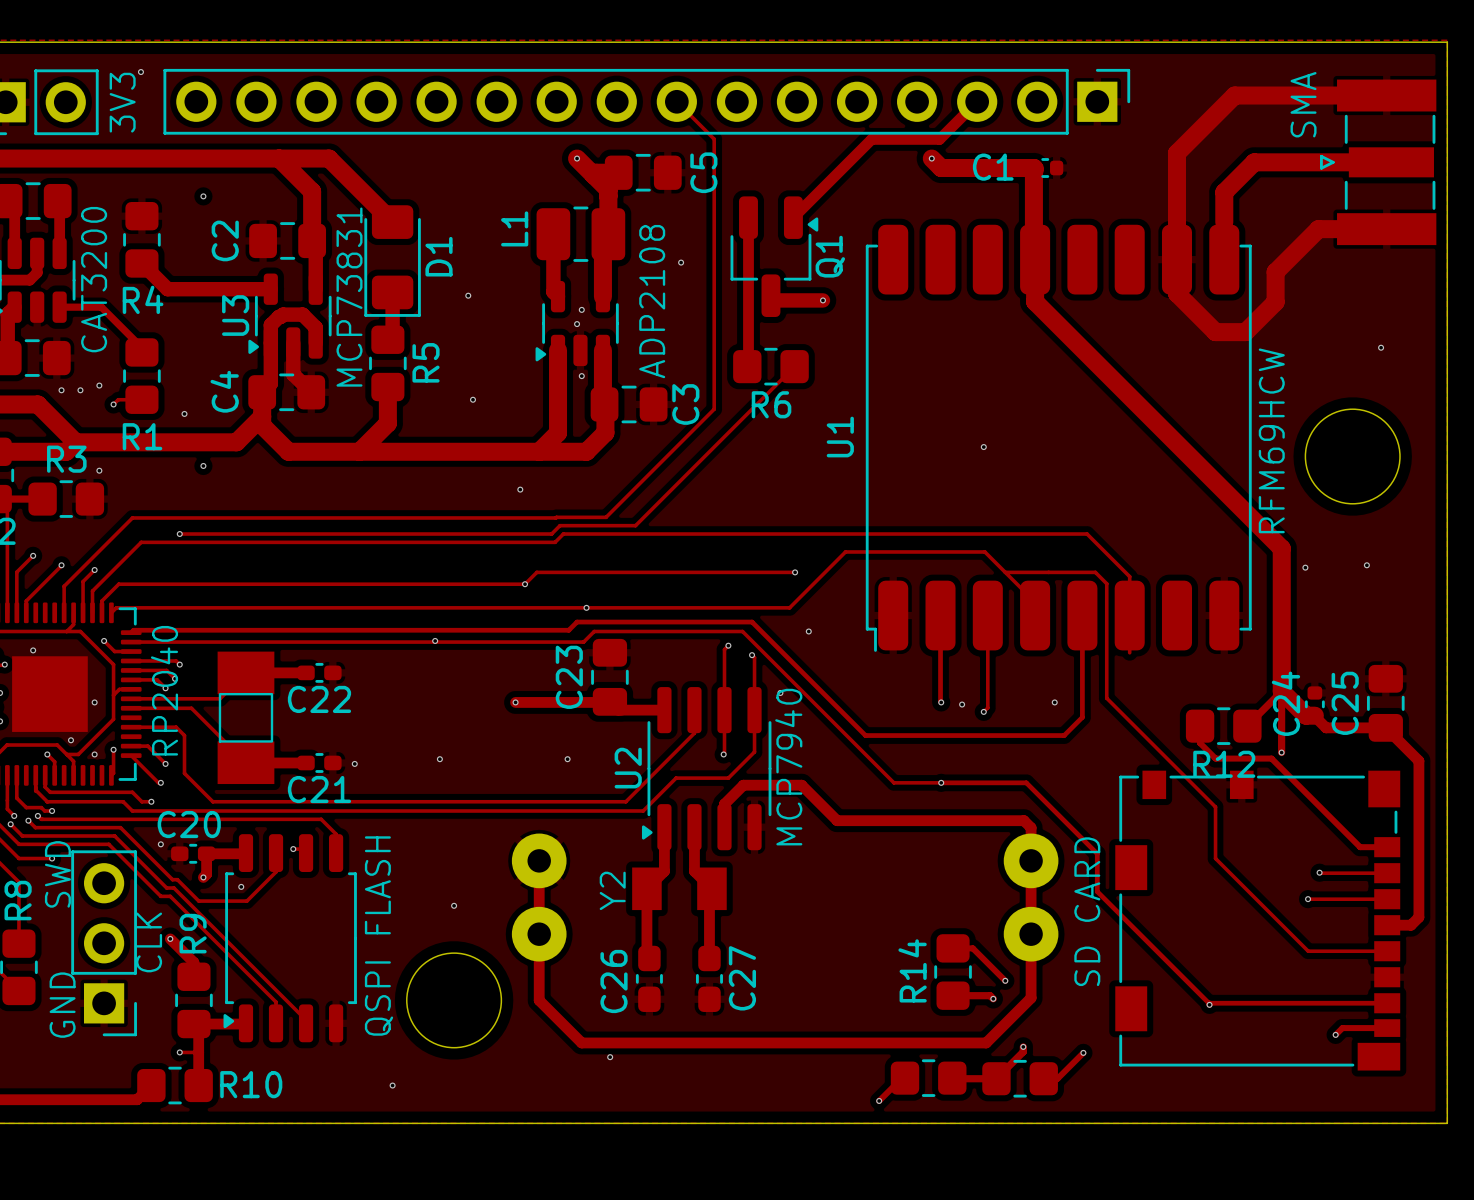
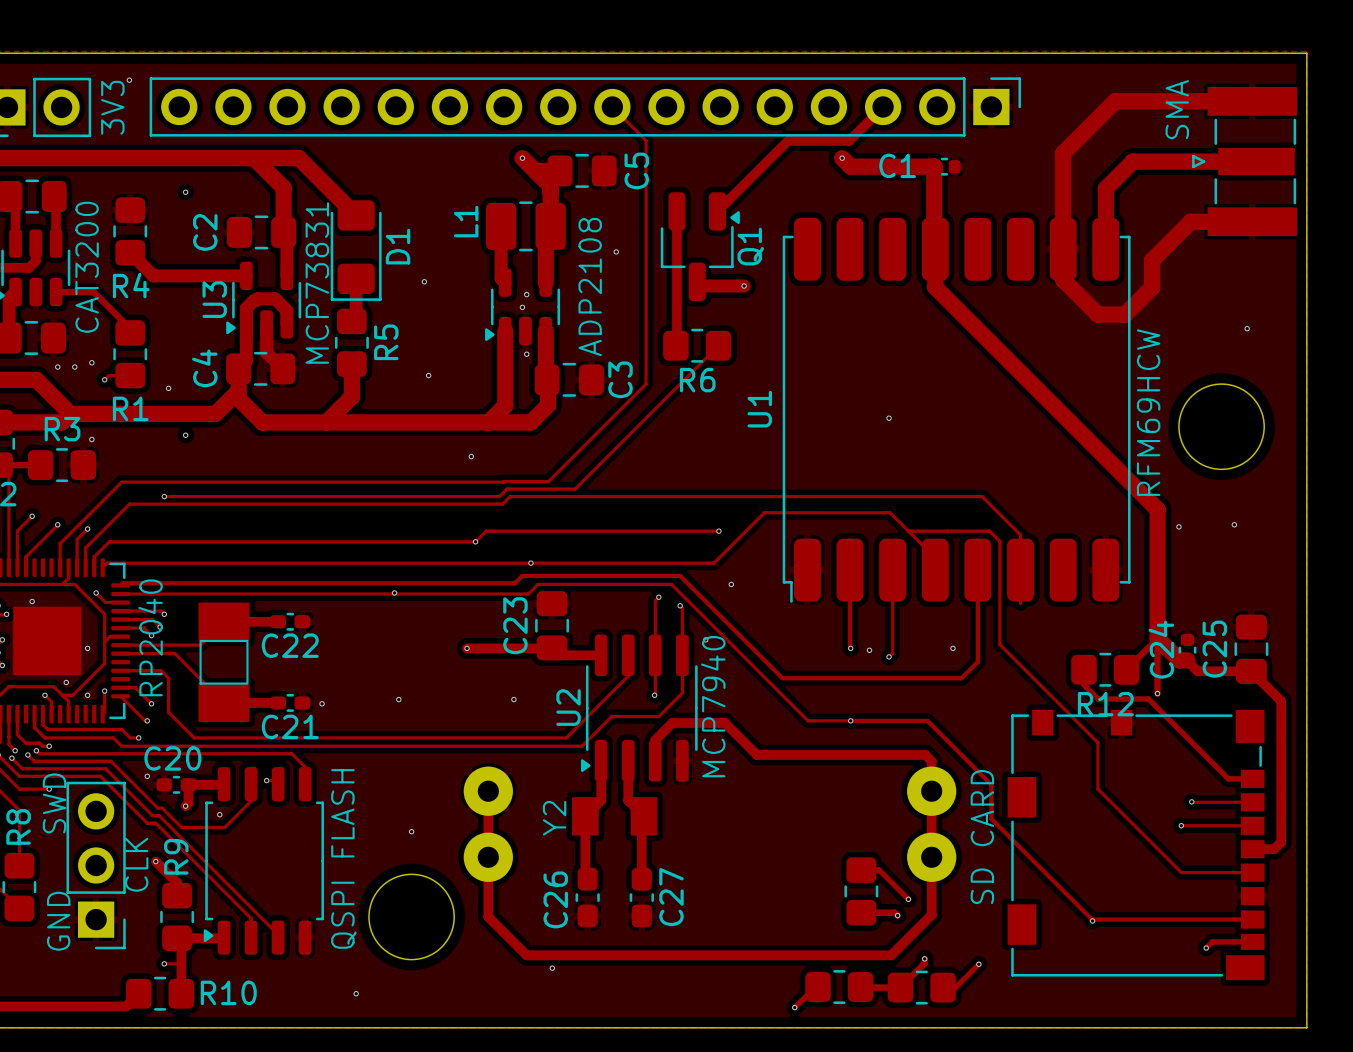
R14 name: R14 (912, 970) -> none

